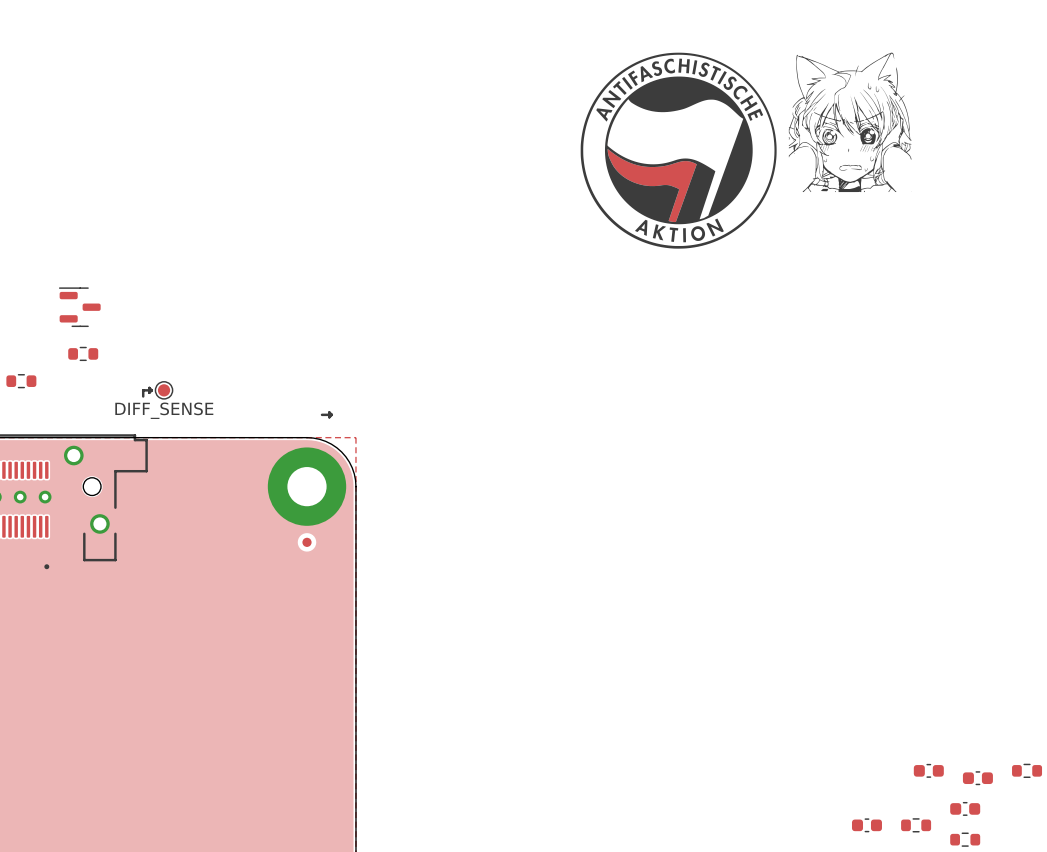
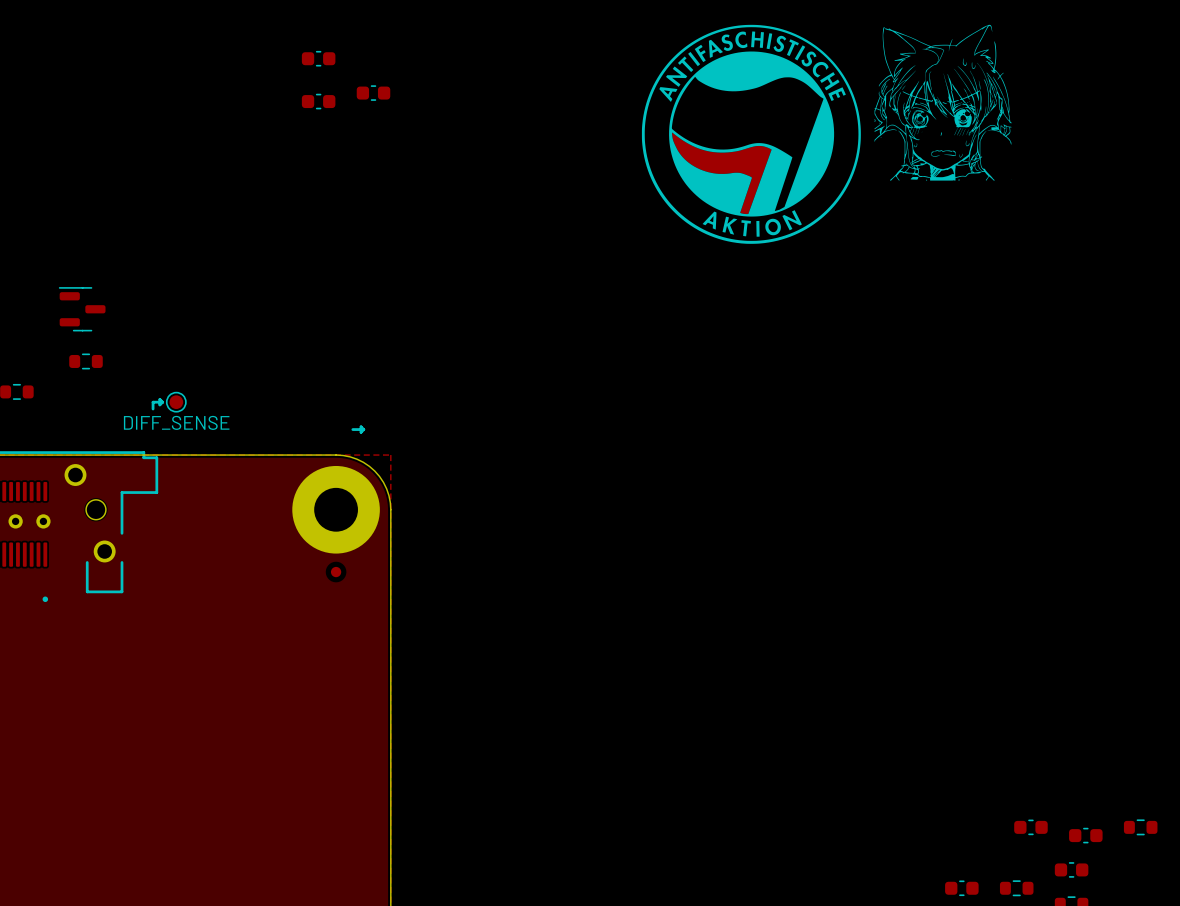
part: none -> (318, 58)
part: none -> (373, 93)
part: none -> (318, 101)

